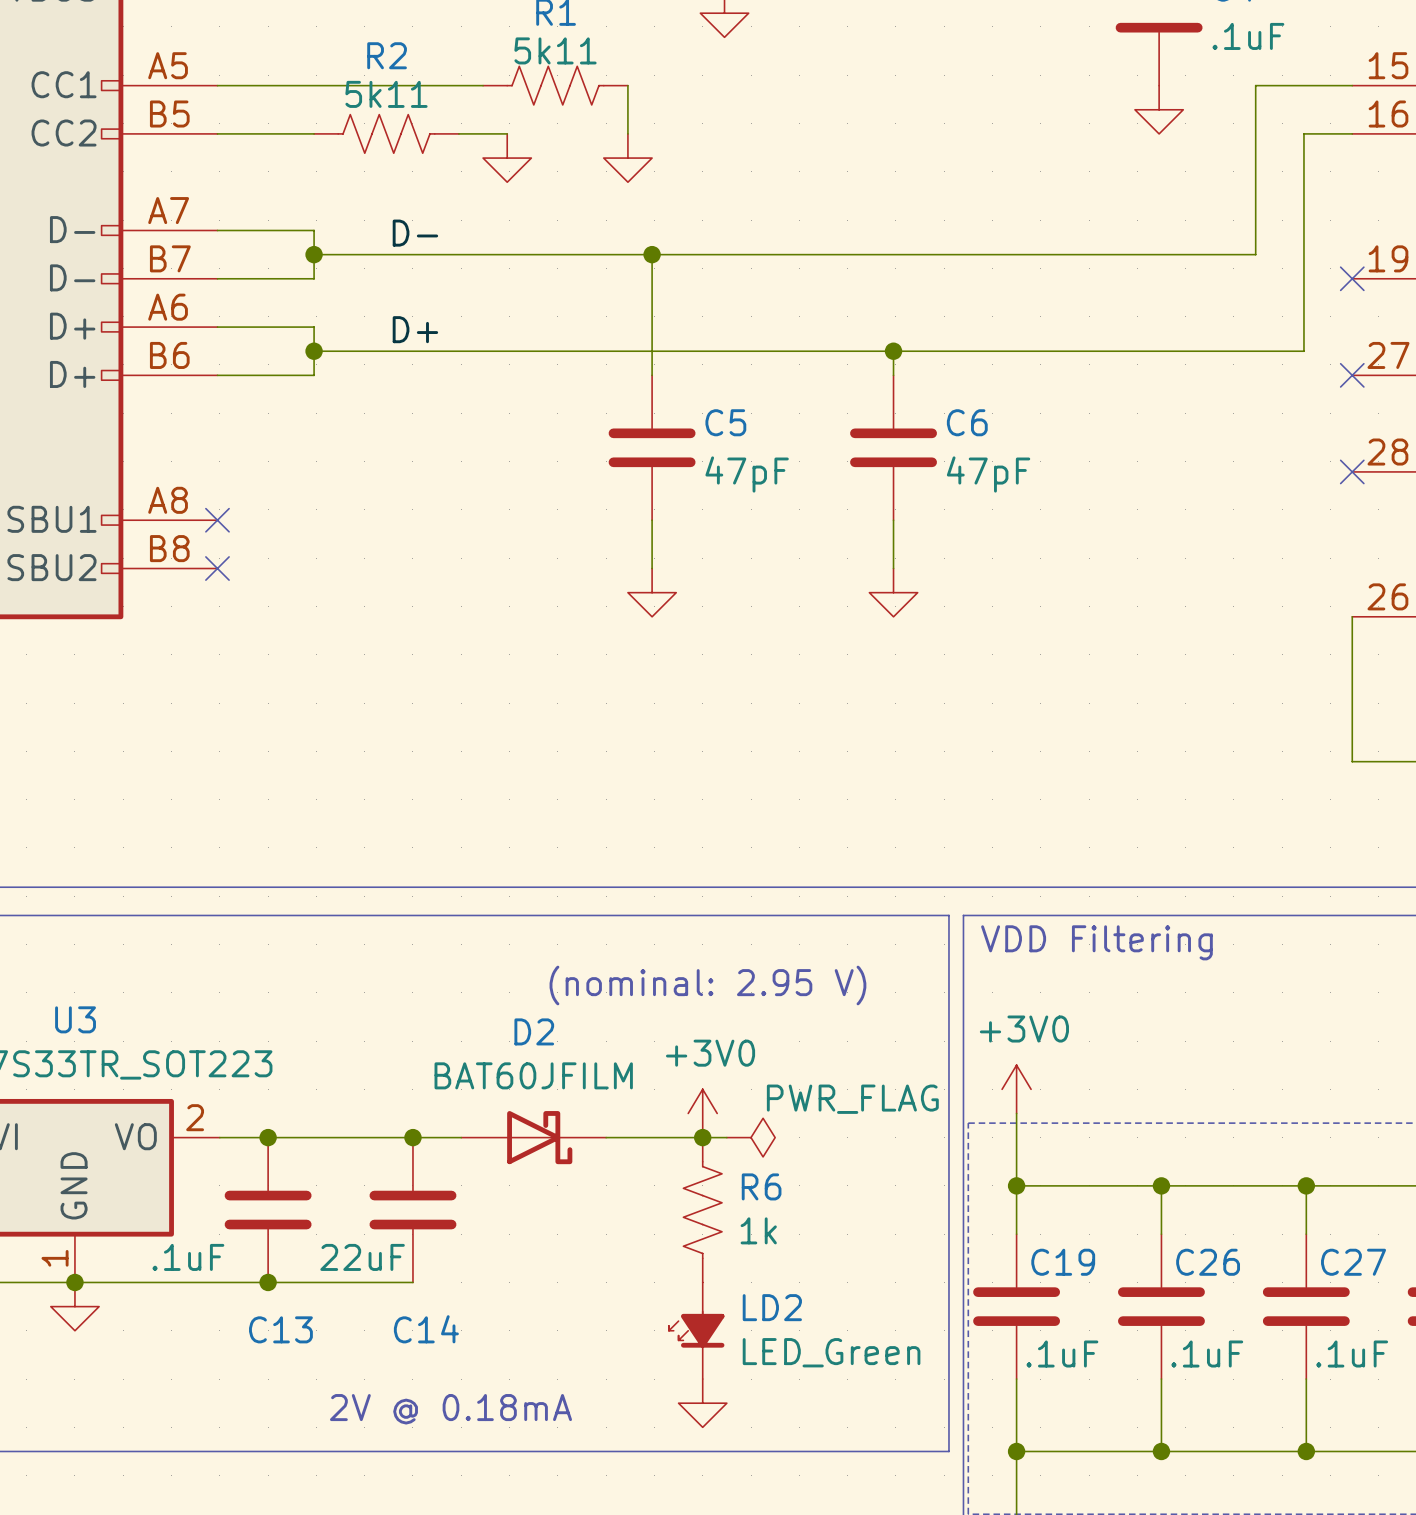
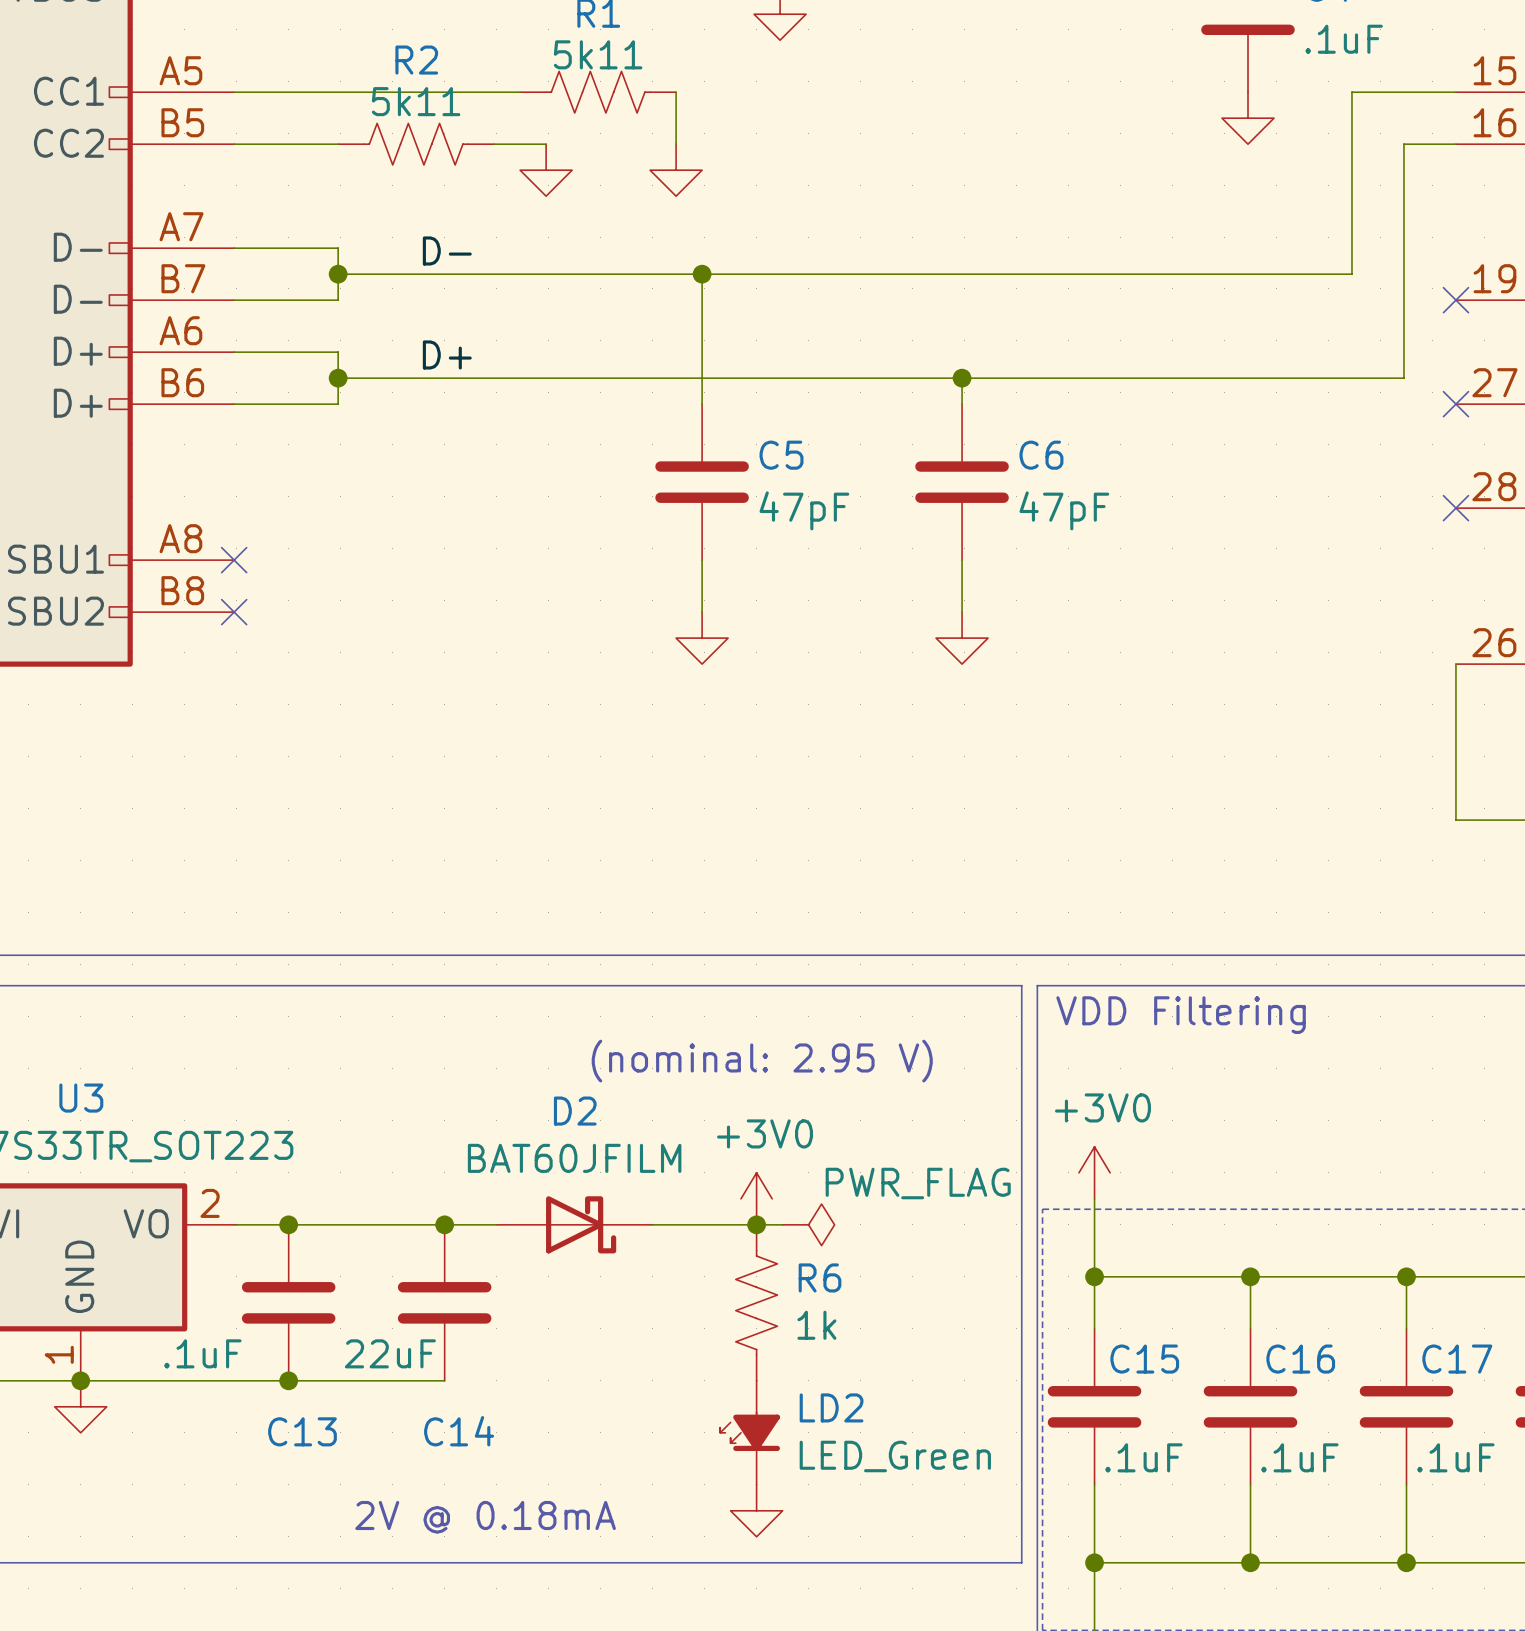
C19 name: C19 (1063, 1262) -> C15 (1144, 1359)
C26 name: C26 (1208, 1262) -> C16 (1300, 1359)
C27 name: C27 (1353, 1262) -> C17 (1457, 1359)

